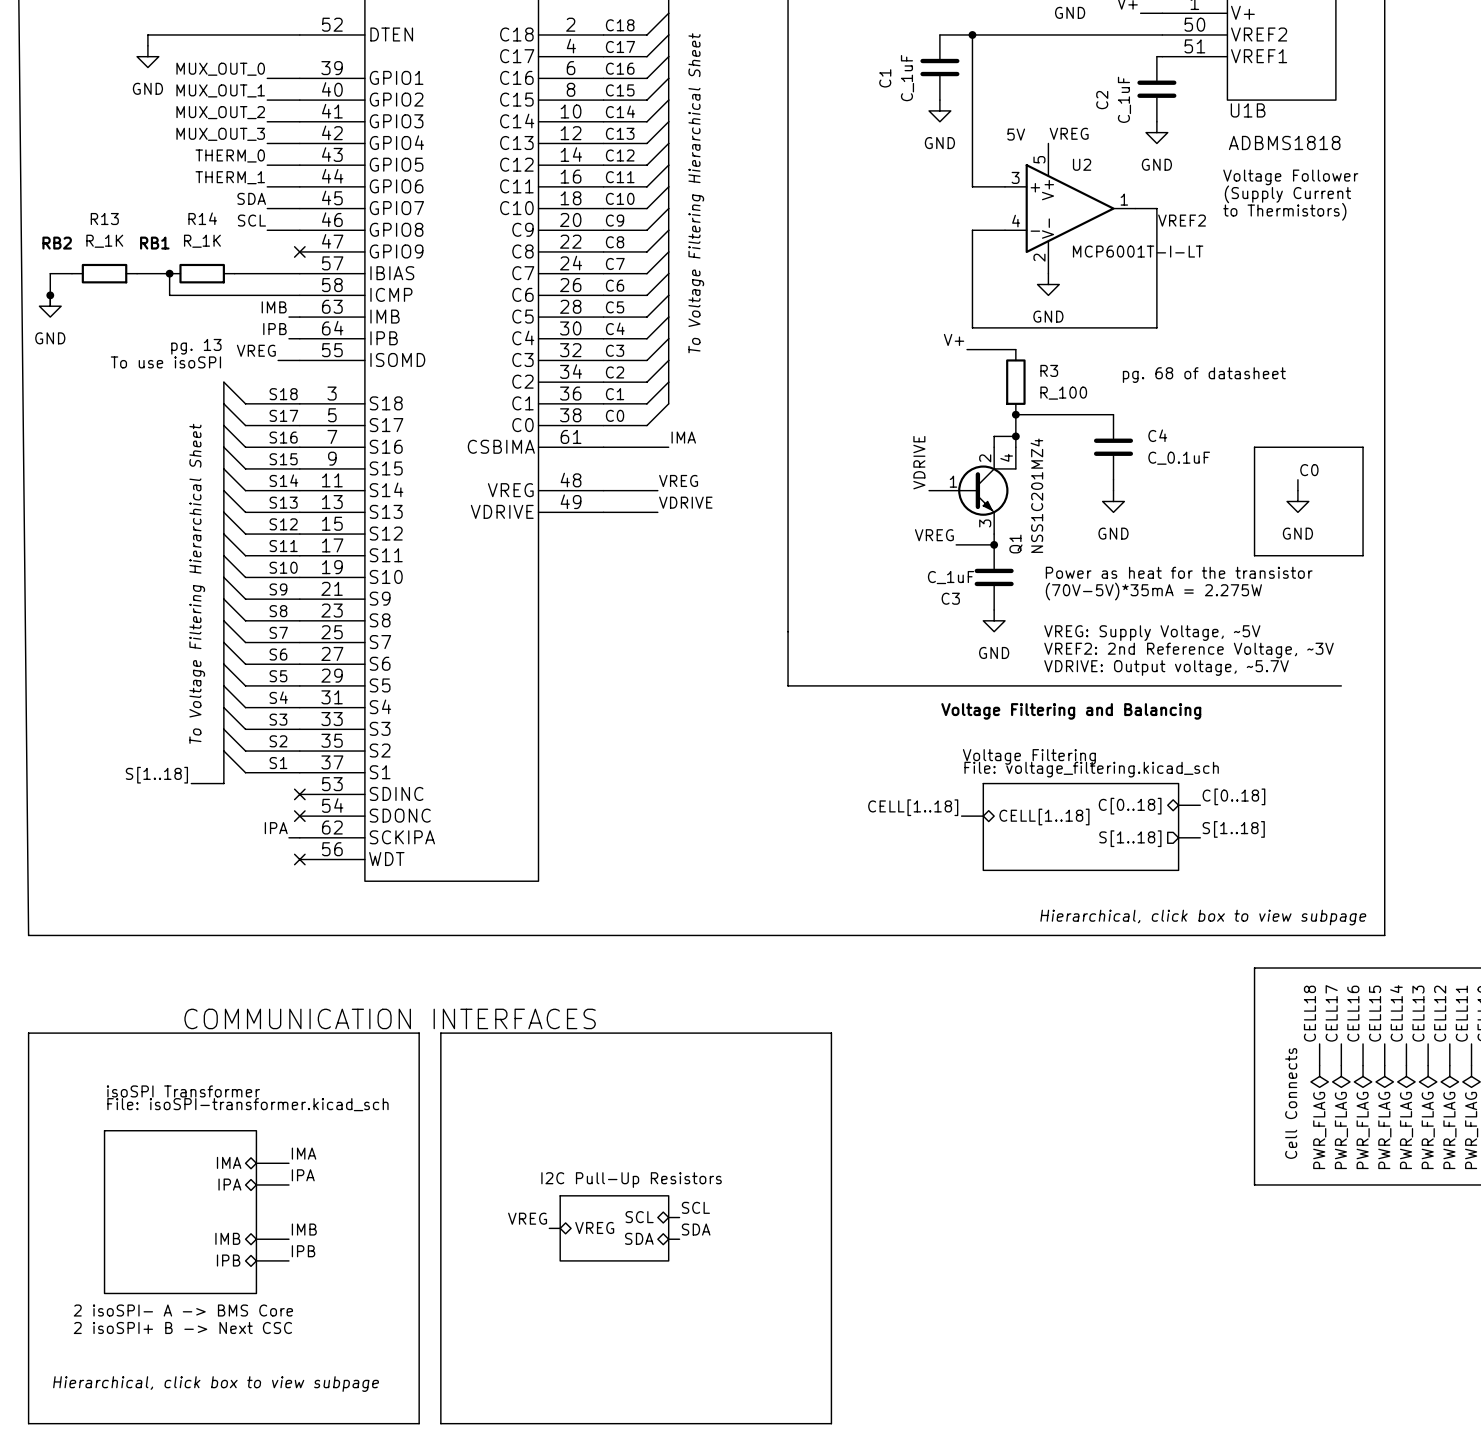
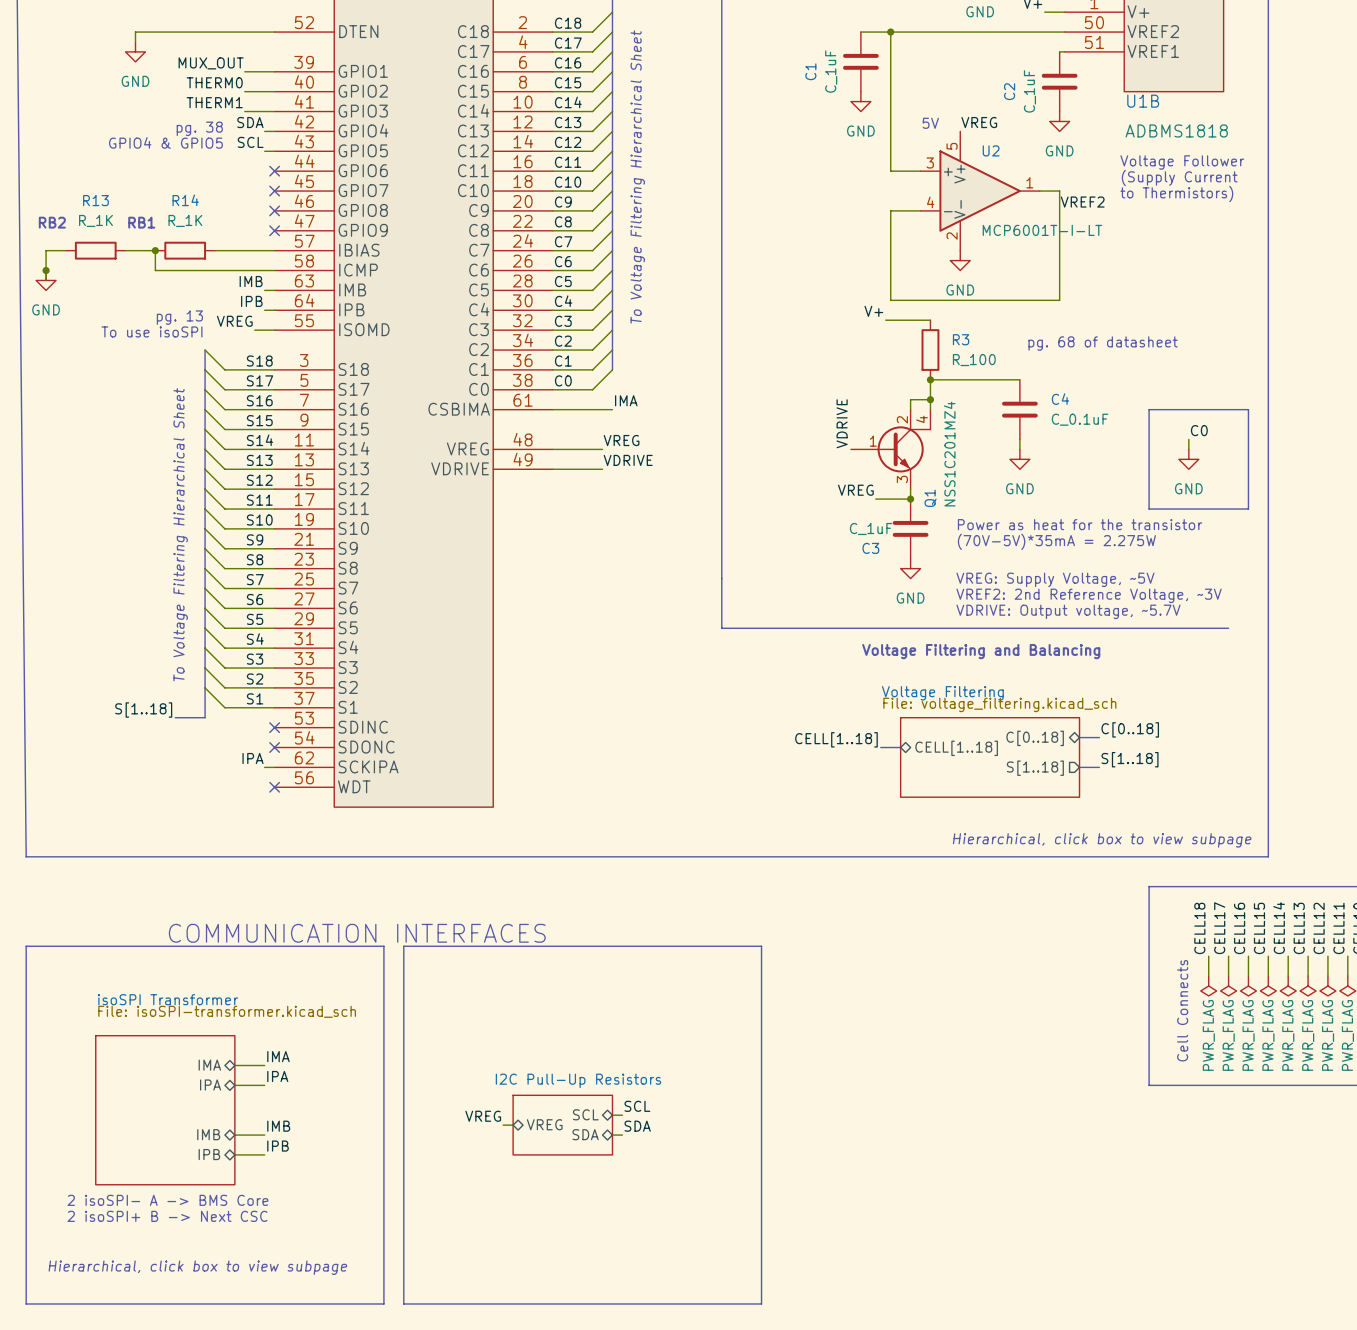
label: MUX_OUT_0 (220, 69) -> MUX_OUT (211, 63)
label: MUX_OUT_1 (220, 90) -> THERM0 (214, 82)
label: MUX_OUT_2 (220, 112) -> THERM1 (214, 102)
label: MUX_OUT_3 (220, 134) -> none
text: none -> pg. 38 (199, 128)
wire: (267, 143) (288, 143) -> none
text: none -> GPIO4 & GPIO5 (165, 142)
label: THERM_0 (230, 156) -> none
wire: (267, 165) (288, 165) -> none
label: THERM_1 (230, 177) -> none
wire: (267, 186) (299, 186) -> none
no-connect mark: none -> (274, 171)
label position: SDA (251, 198) -> SDA (250, 122)
wire: (267, 208) (299, 208) -> none
no-connect mark: none -> (274, 191)
label position: SCL (251, 220) -> SCL (250, 142)
wire: (267, 230) (299, 230) -> none
no-connect mark: none -> (274, 210)

